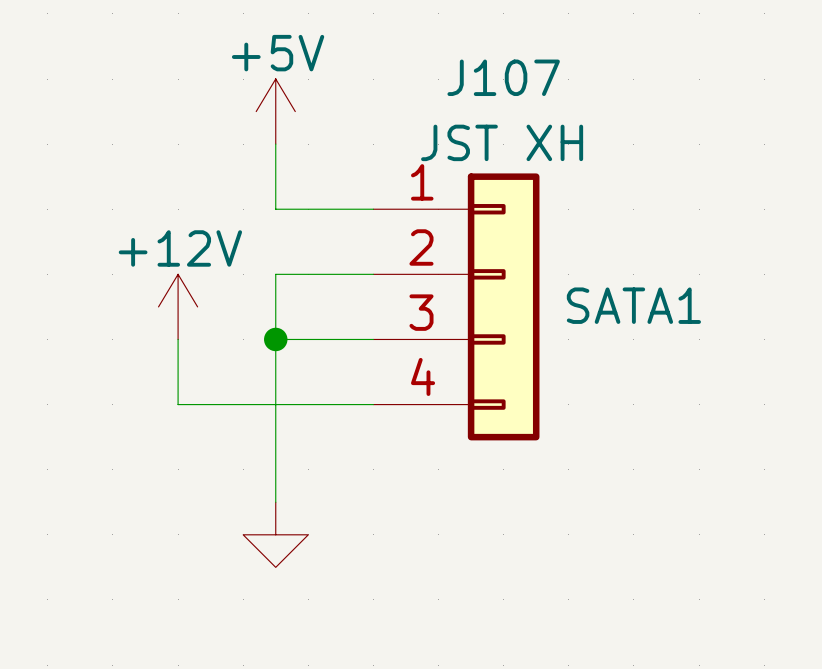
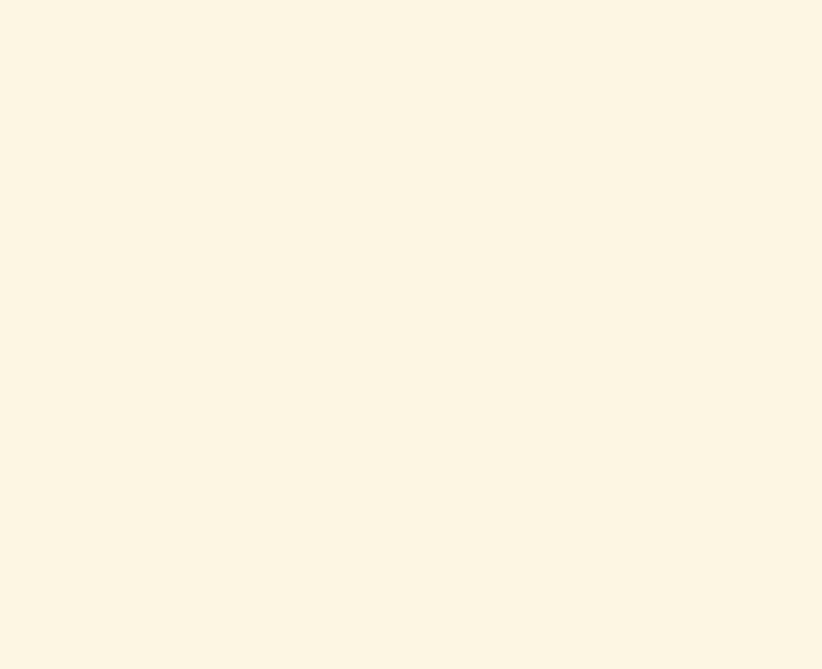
power symbol: +5V (275, 111) -> none
wire: (275, 144) (275, 209) (373, 209) -> none
wire: (373, 274) (275, 274) (275, 502) -> none
power symbol: +12V (178, 306) -> none
J107: JST XH (456, 306) -> none
wire: (178, 339) (178, 404) (373, 404) -> none
wire: (275, 339) (373, 339) -> none
junction: (275, 339) -> none
power symbol: (275, 534) -> none

